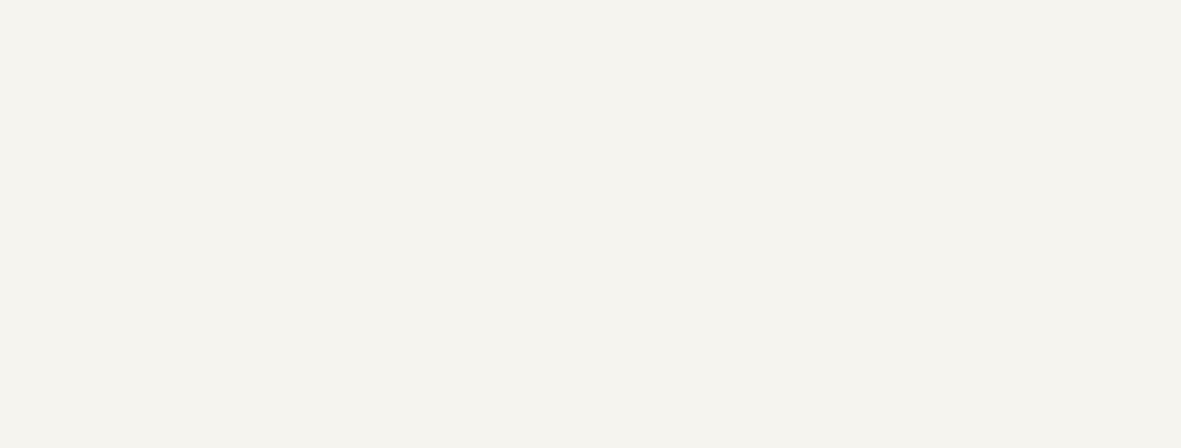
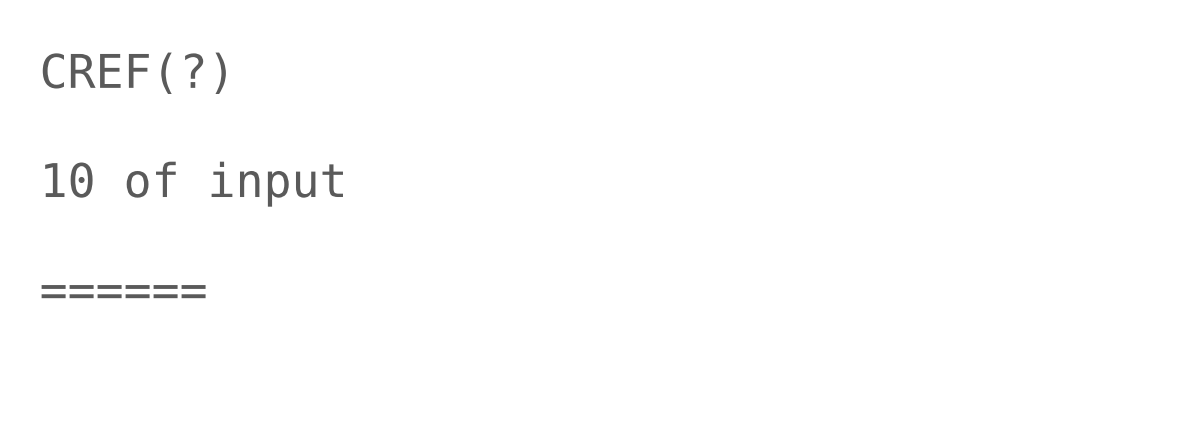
text: none -> CREF(?) (134, 73)
text: none -> 10 of input (194, 184)
text: none -> ====== (123, 291)

